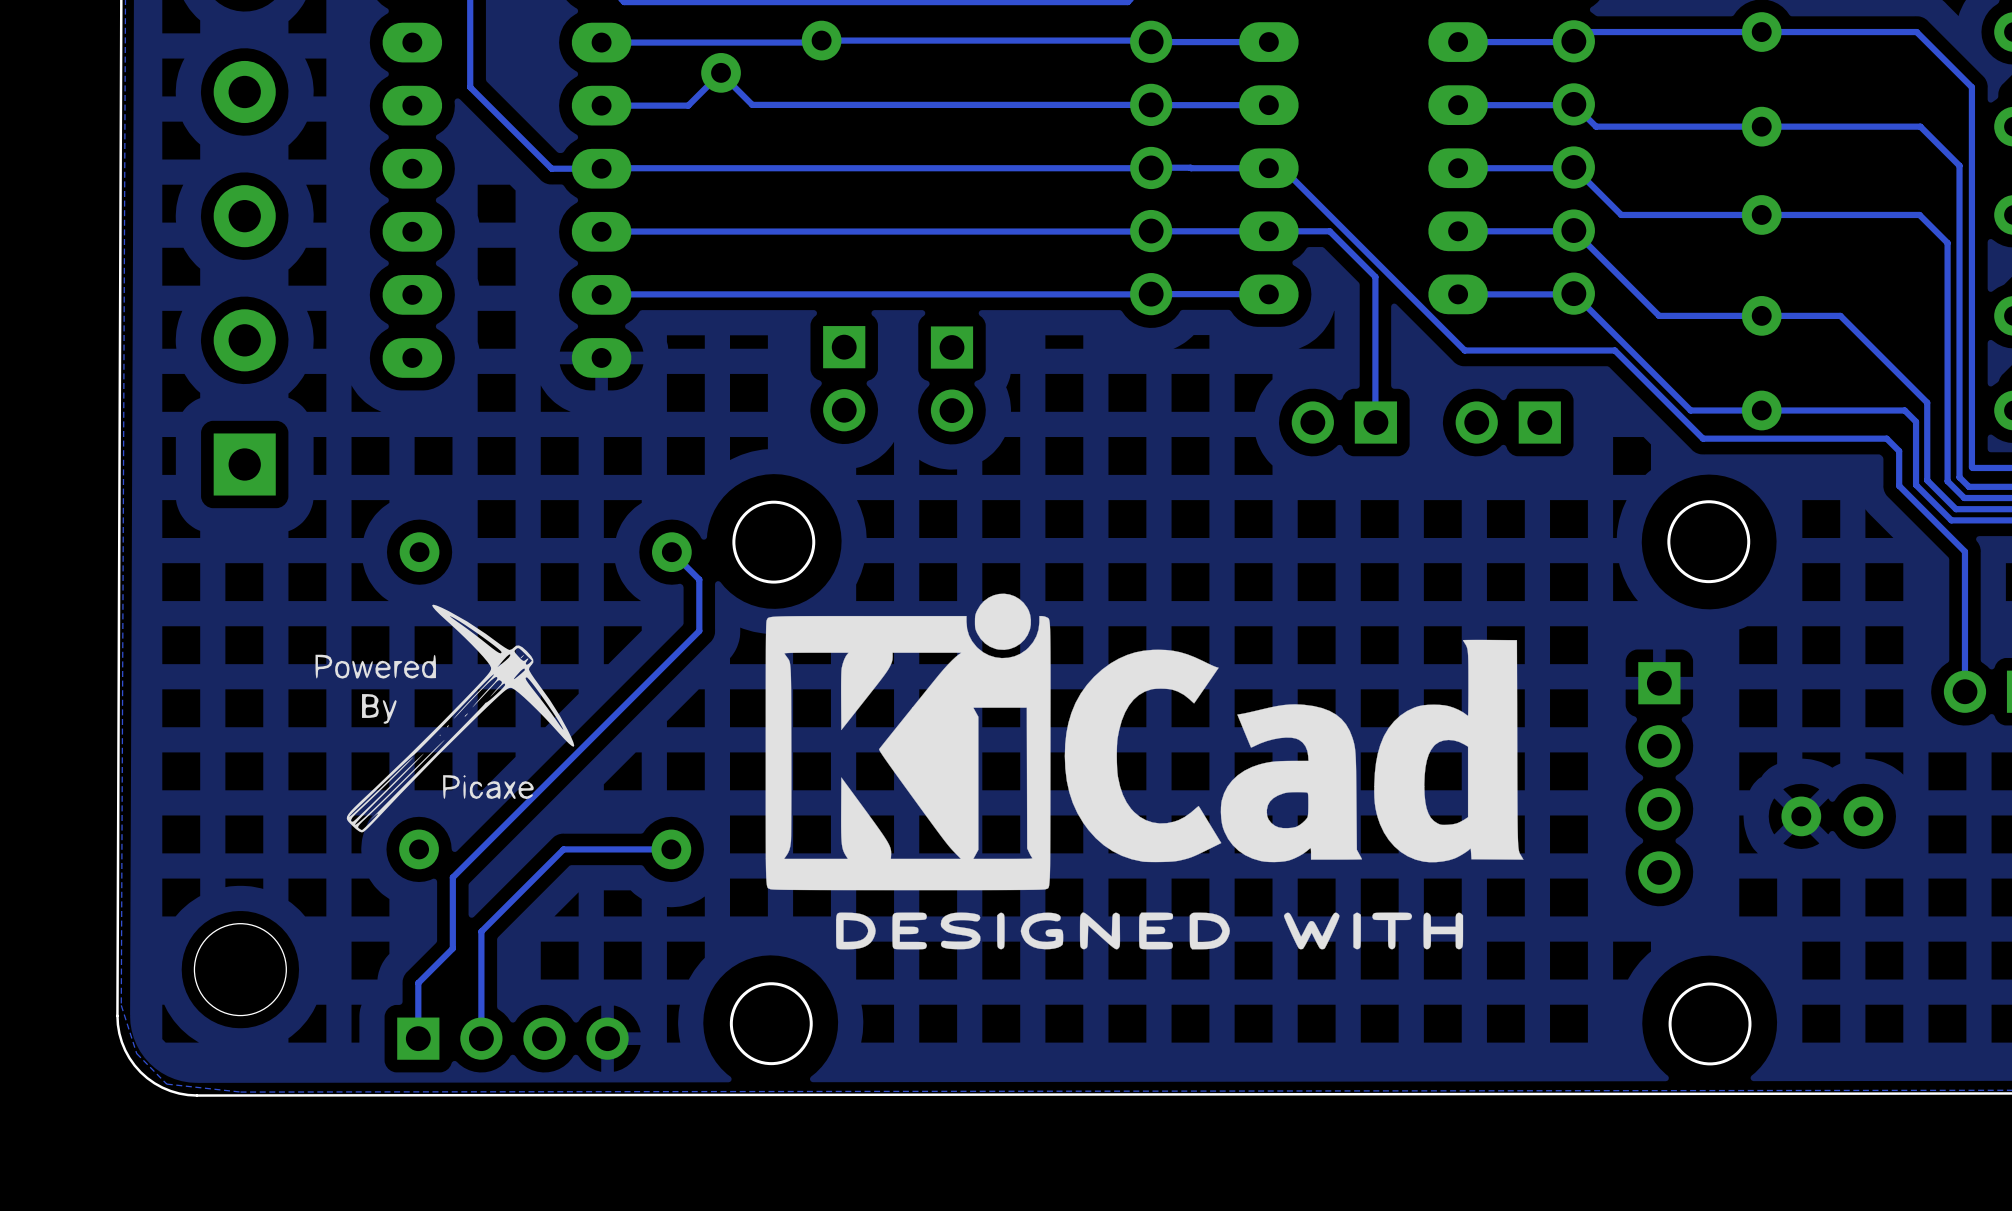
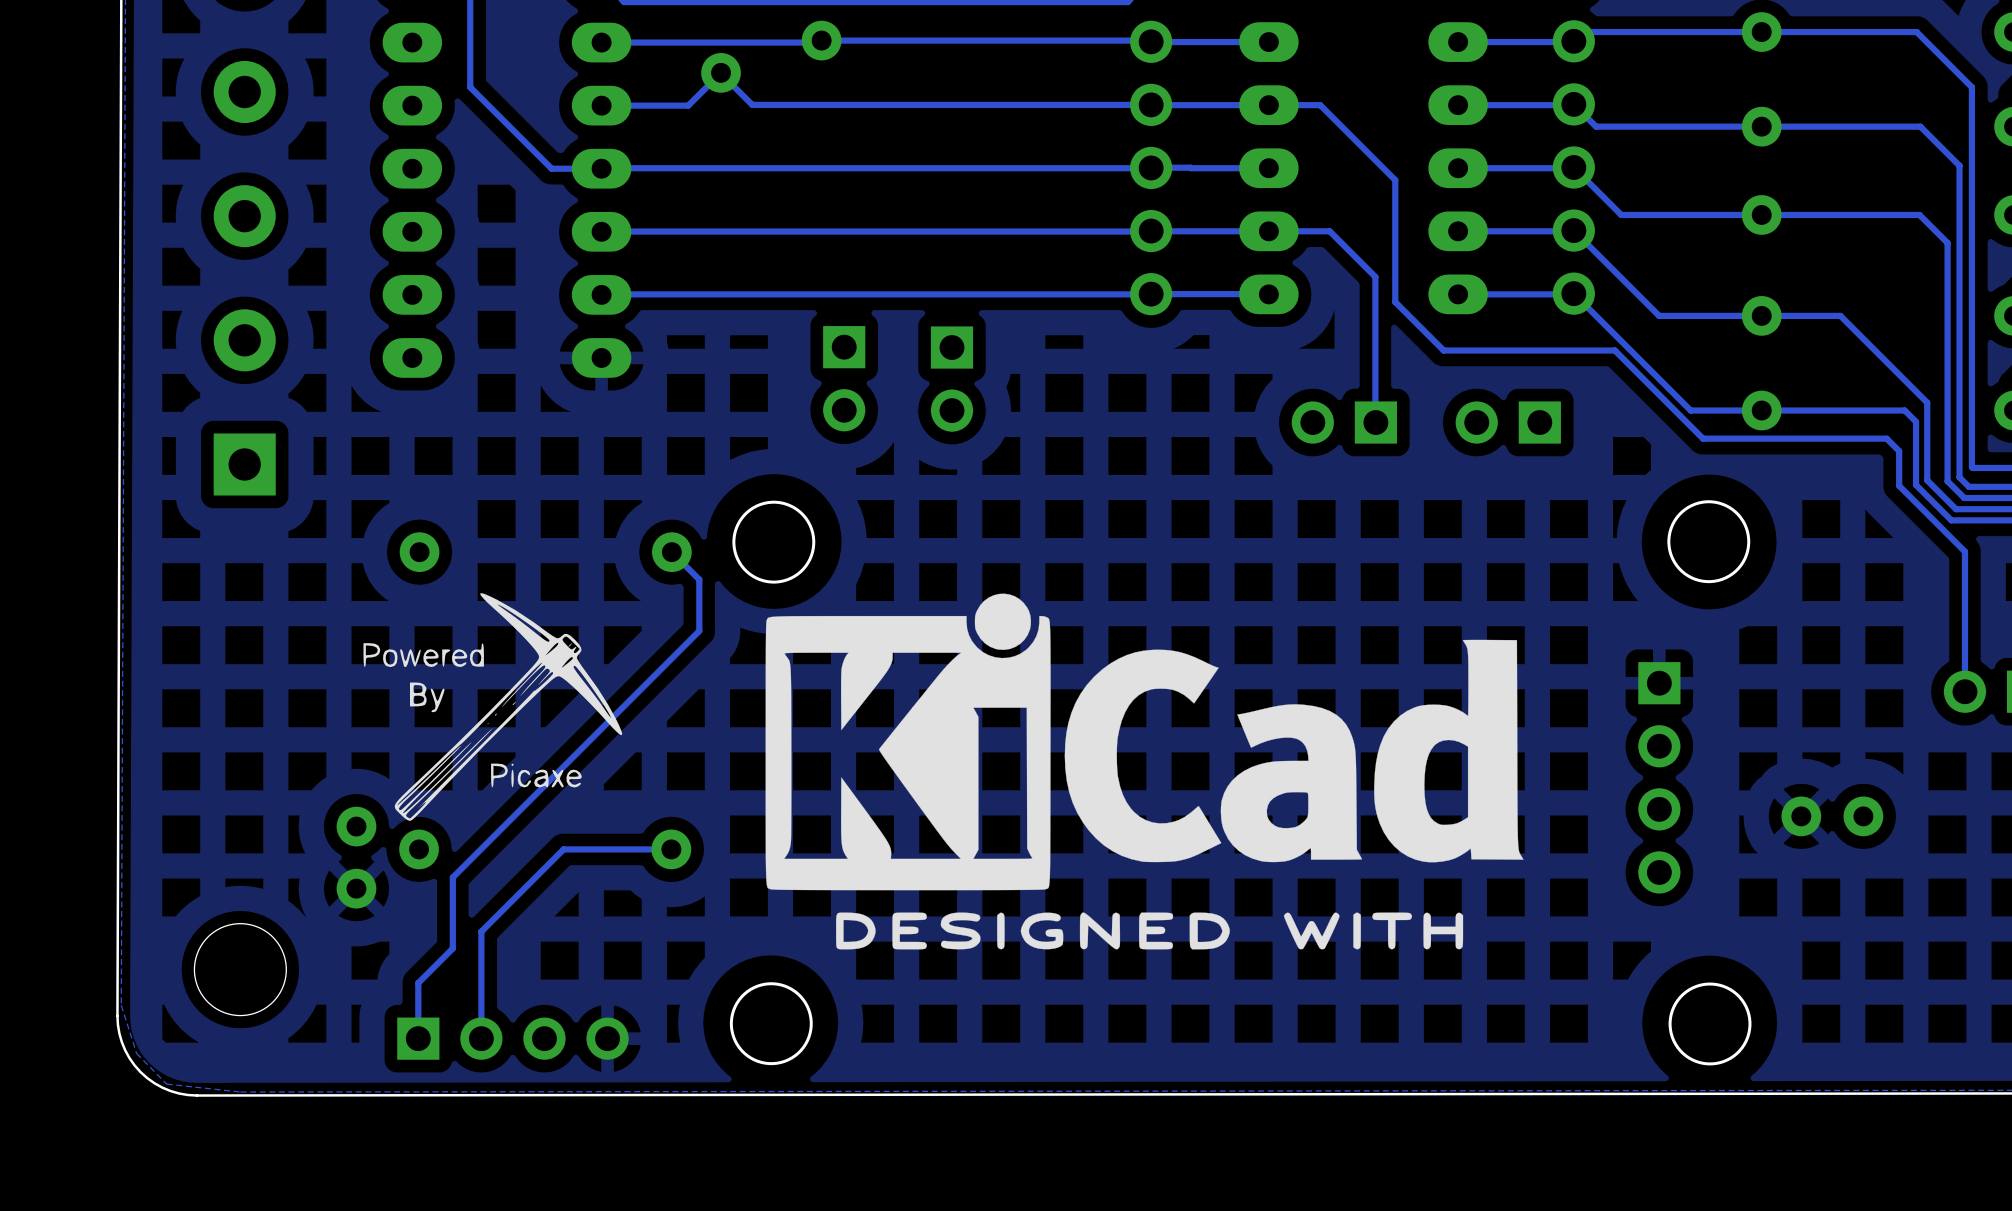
track: (1268, 168) (1282, 168) (1464, 350) -> (1268, 105) (1320, 105) (1395, 180) (1395, 302) (1443, 350) (1464, 350)
drawing position: (444, 718) -> (492, 706)
part: none -> (356, 857)

